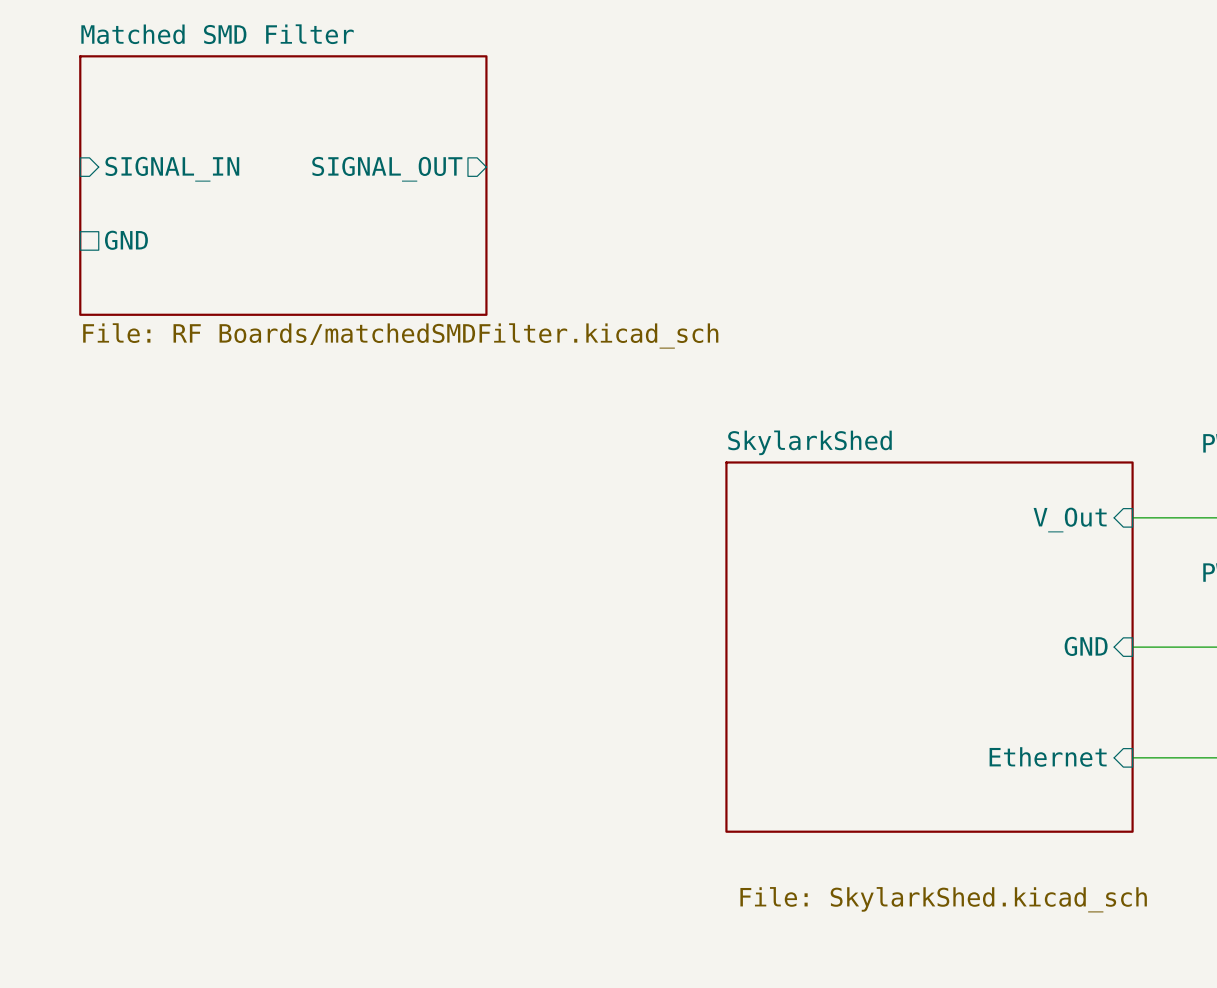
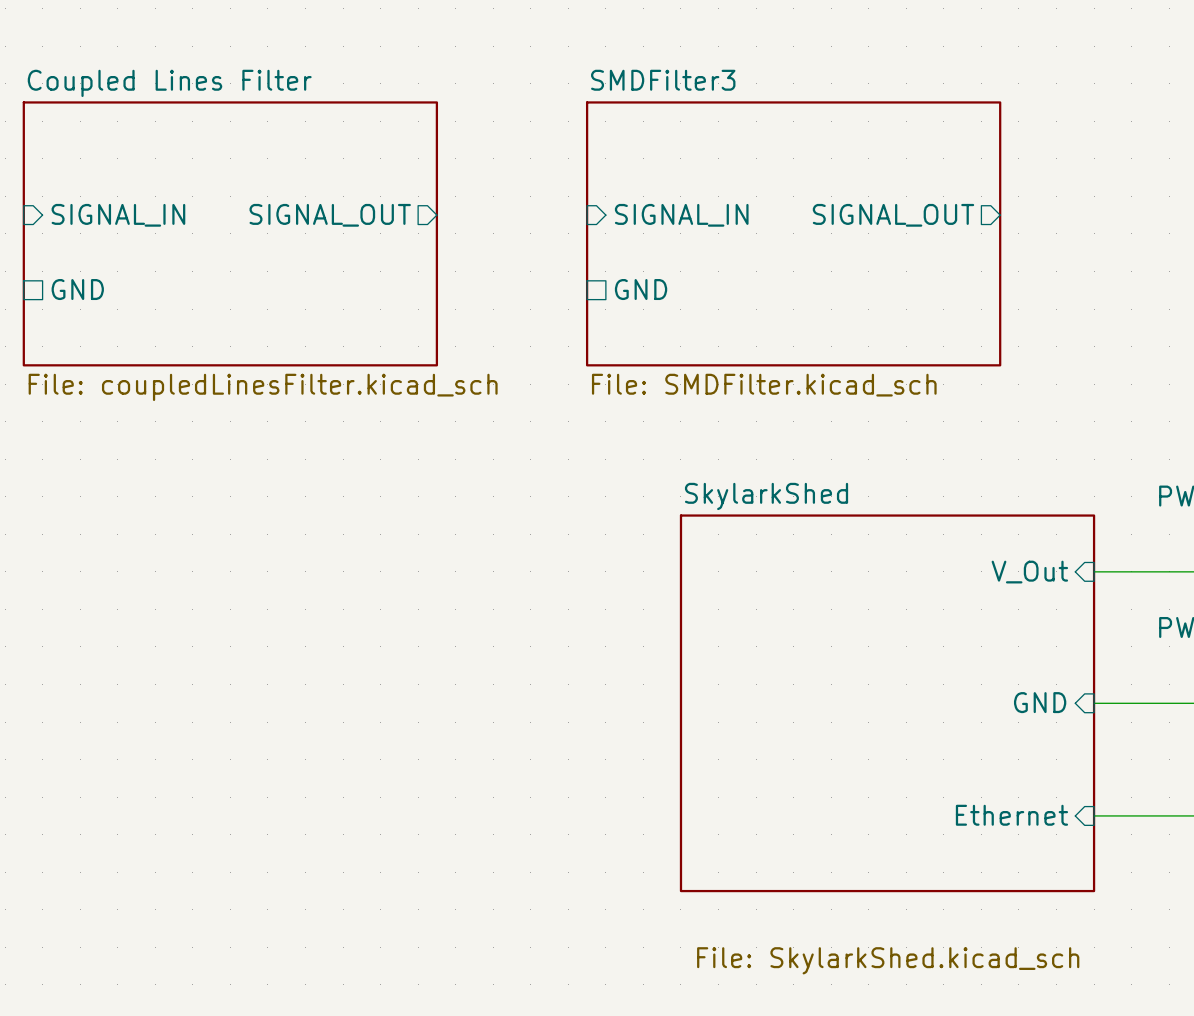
sheet Matched SMD Filter name: Matched SMD Filter (217, 34) -> Coupled Lines Filter (169, 83)
sheet pin: none -> SIGNAL_IN (681, 215)
sheet pin: none -> SIGNAL_OUT (893, 215)
sheet SMDFilter3: none -> File: SMDFilter.kicad_sch (793, 233)
sheet pin: none -> GND (641, 289)
sheet Matched SMD Filter value: File: RF Boards/matchedSMDFilter.kicad_sch (400, 335) -> File: coupledLinesFilter.kicad_sch (263, 387)

